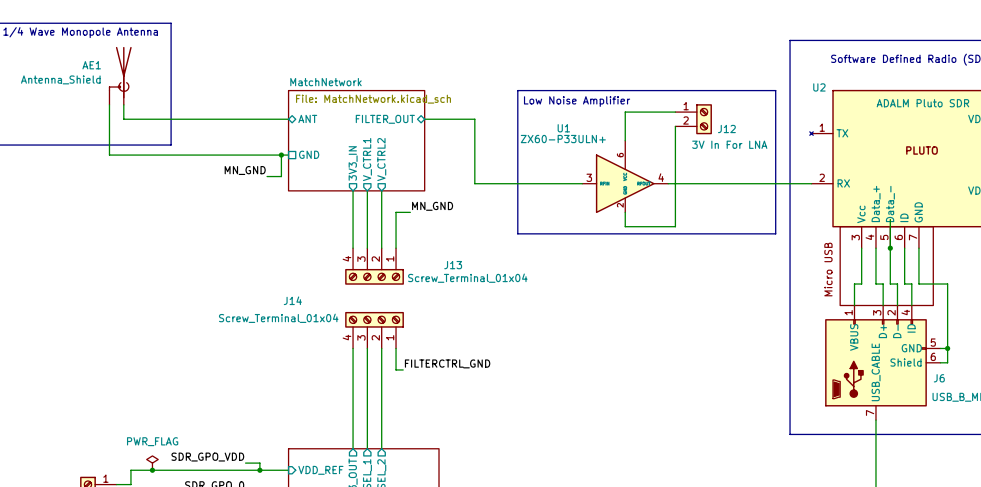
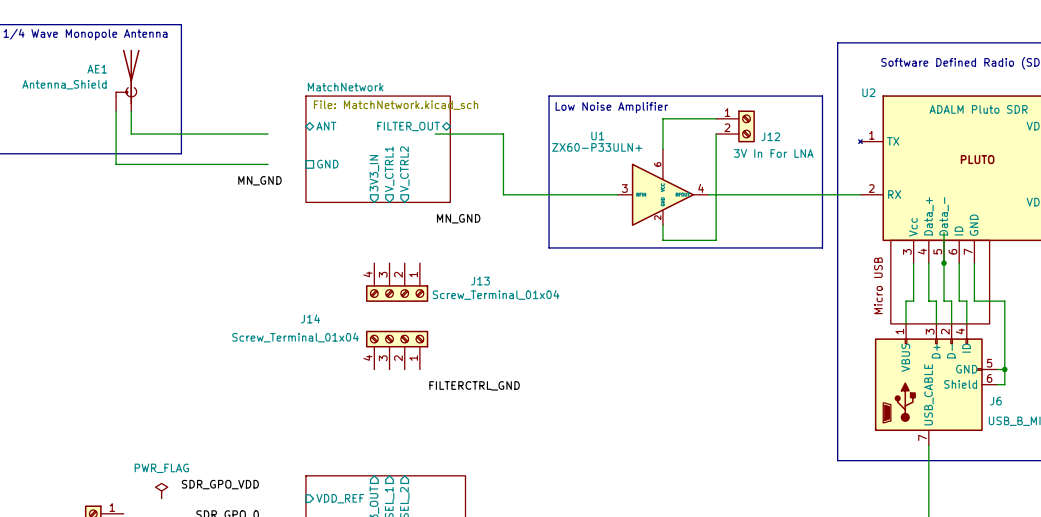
wire: (123, 119) (288, 119) -> (131, 126) (131, 134) (267, 134)
wire: (424, 119) (474, 119) (474, 126) -> (435, 134) (503, 134)
wire: (252, 155) (288, 155) -> none
wire: (281, 155) (281, 176) (267, 176) -> none
junction: (281, 155) -> none
wire: (353, 190) (353, 248) -> none
wire: (367, 190) (367, 248) -> none
wire: (381, 190) (381, 248) -> none
wire: (410, 212) (396, 212) (396, 248) -> none
wire: (353, 348) (353, 448) -> none
wire: (367, 348) (367, 448) -> none
wire: (381, 348) (381, 448) -> none
wire: (396, 348) (396, 369) (403, 369) -> none
wire: (245, 463) (259, 463) (259, 470) -> none
junction: (152, 470) -> none
junction: (259, 470) -> none
wire: (288, 470) (130, 470) (130, 484) (116, 484) -> none

